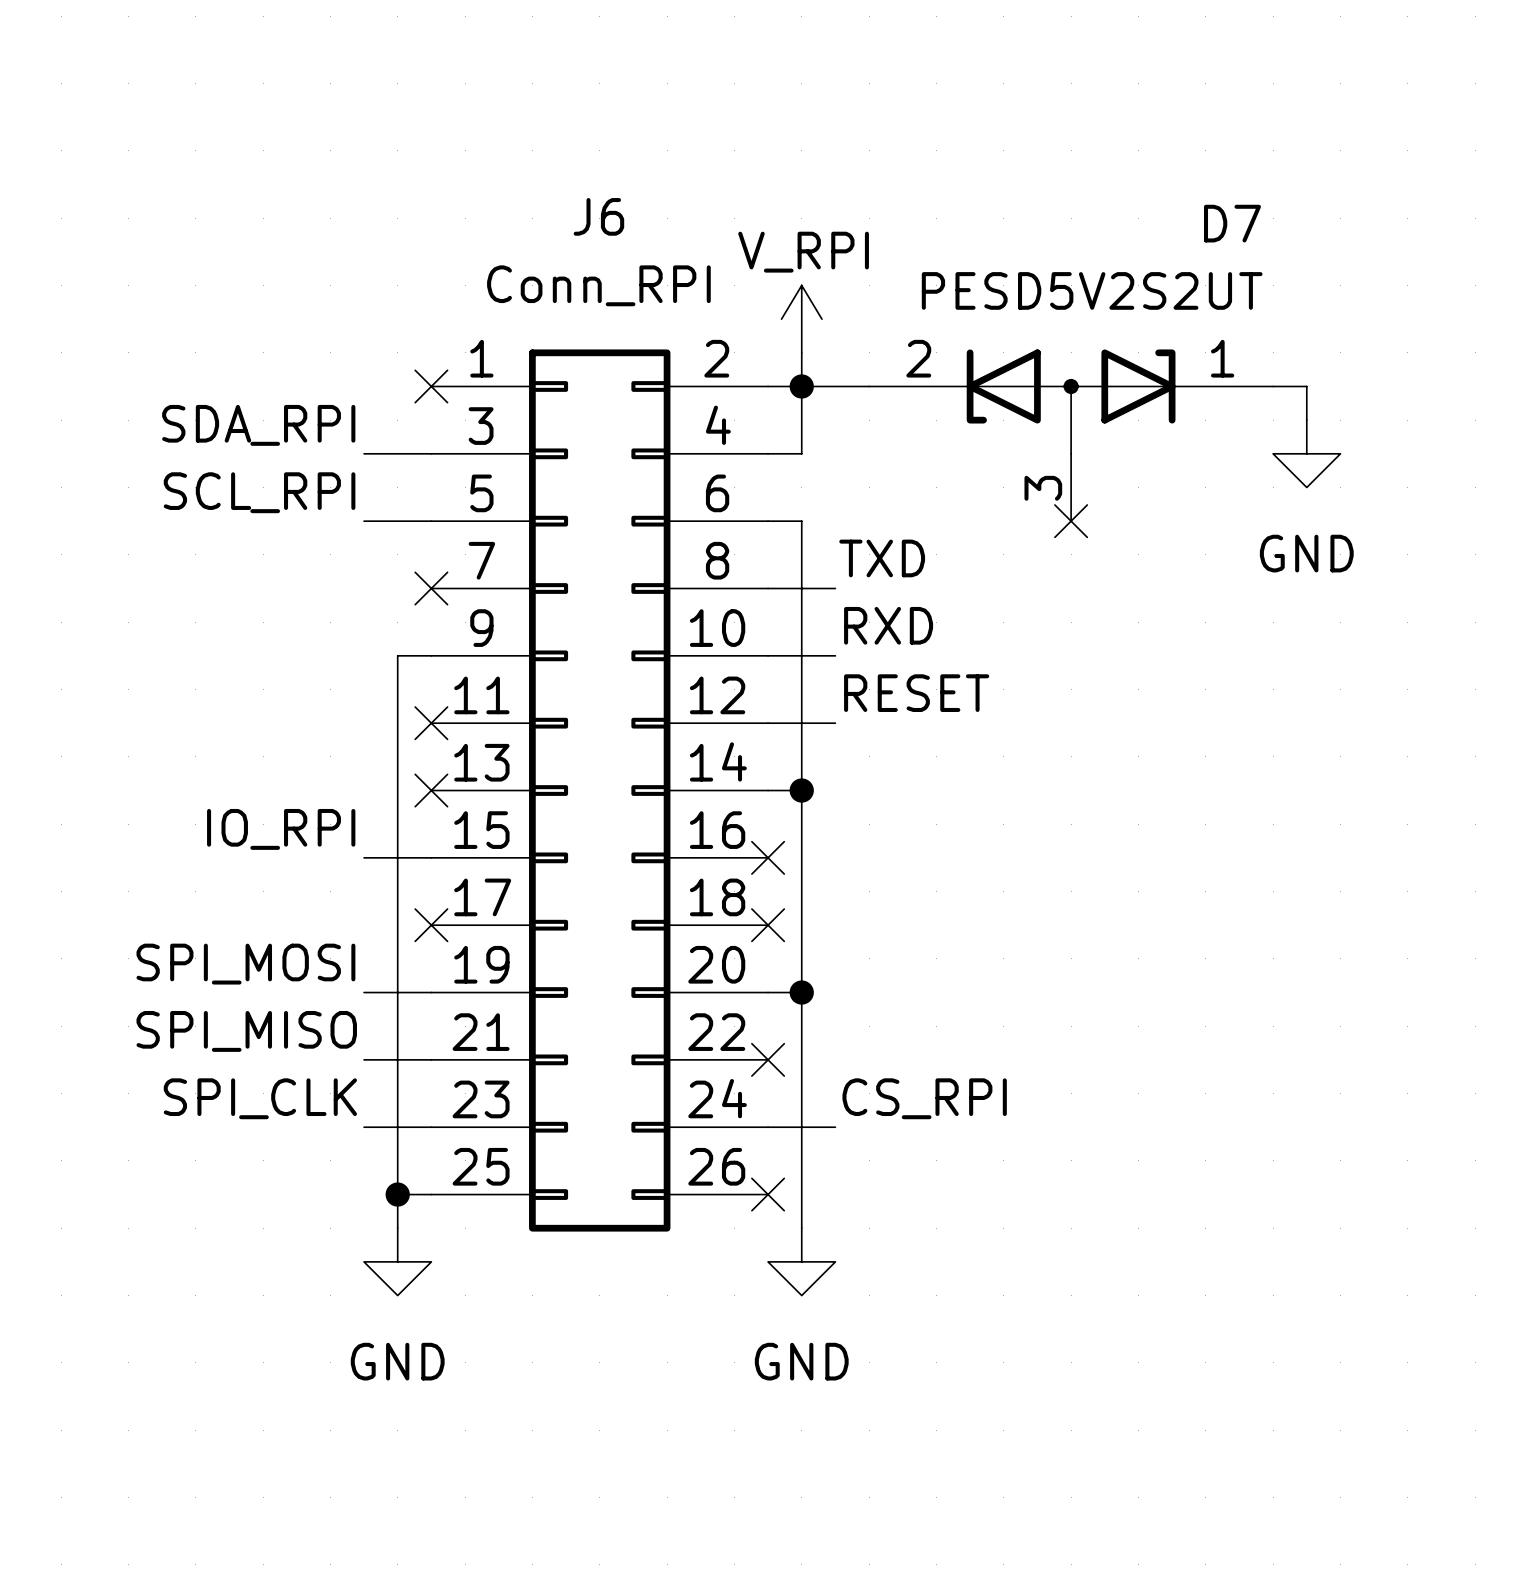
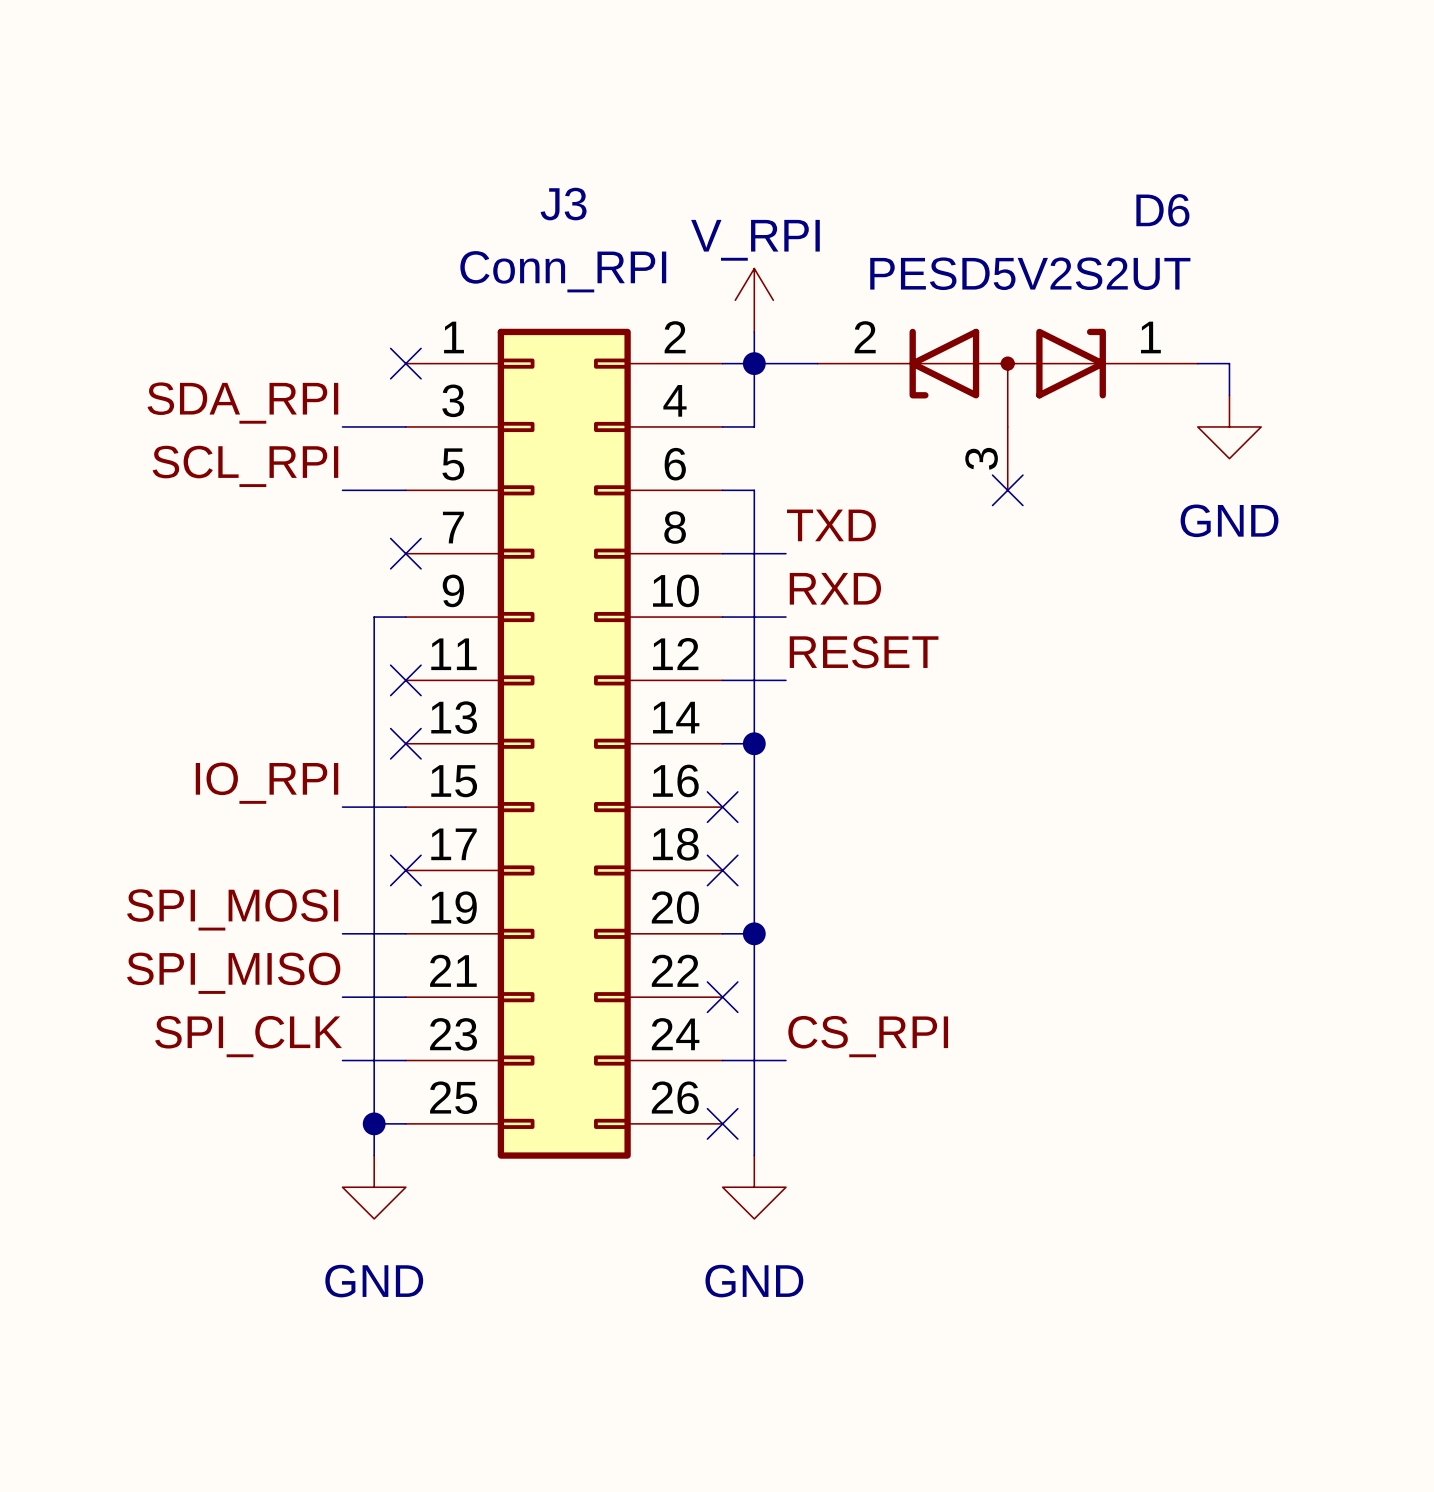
J6 name: J6 (598, 216) -> J3 (563, 204)
D7 name: D7 (1232, 223) -> D6 (1162, 210)

